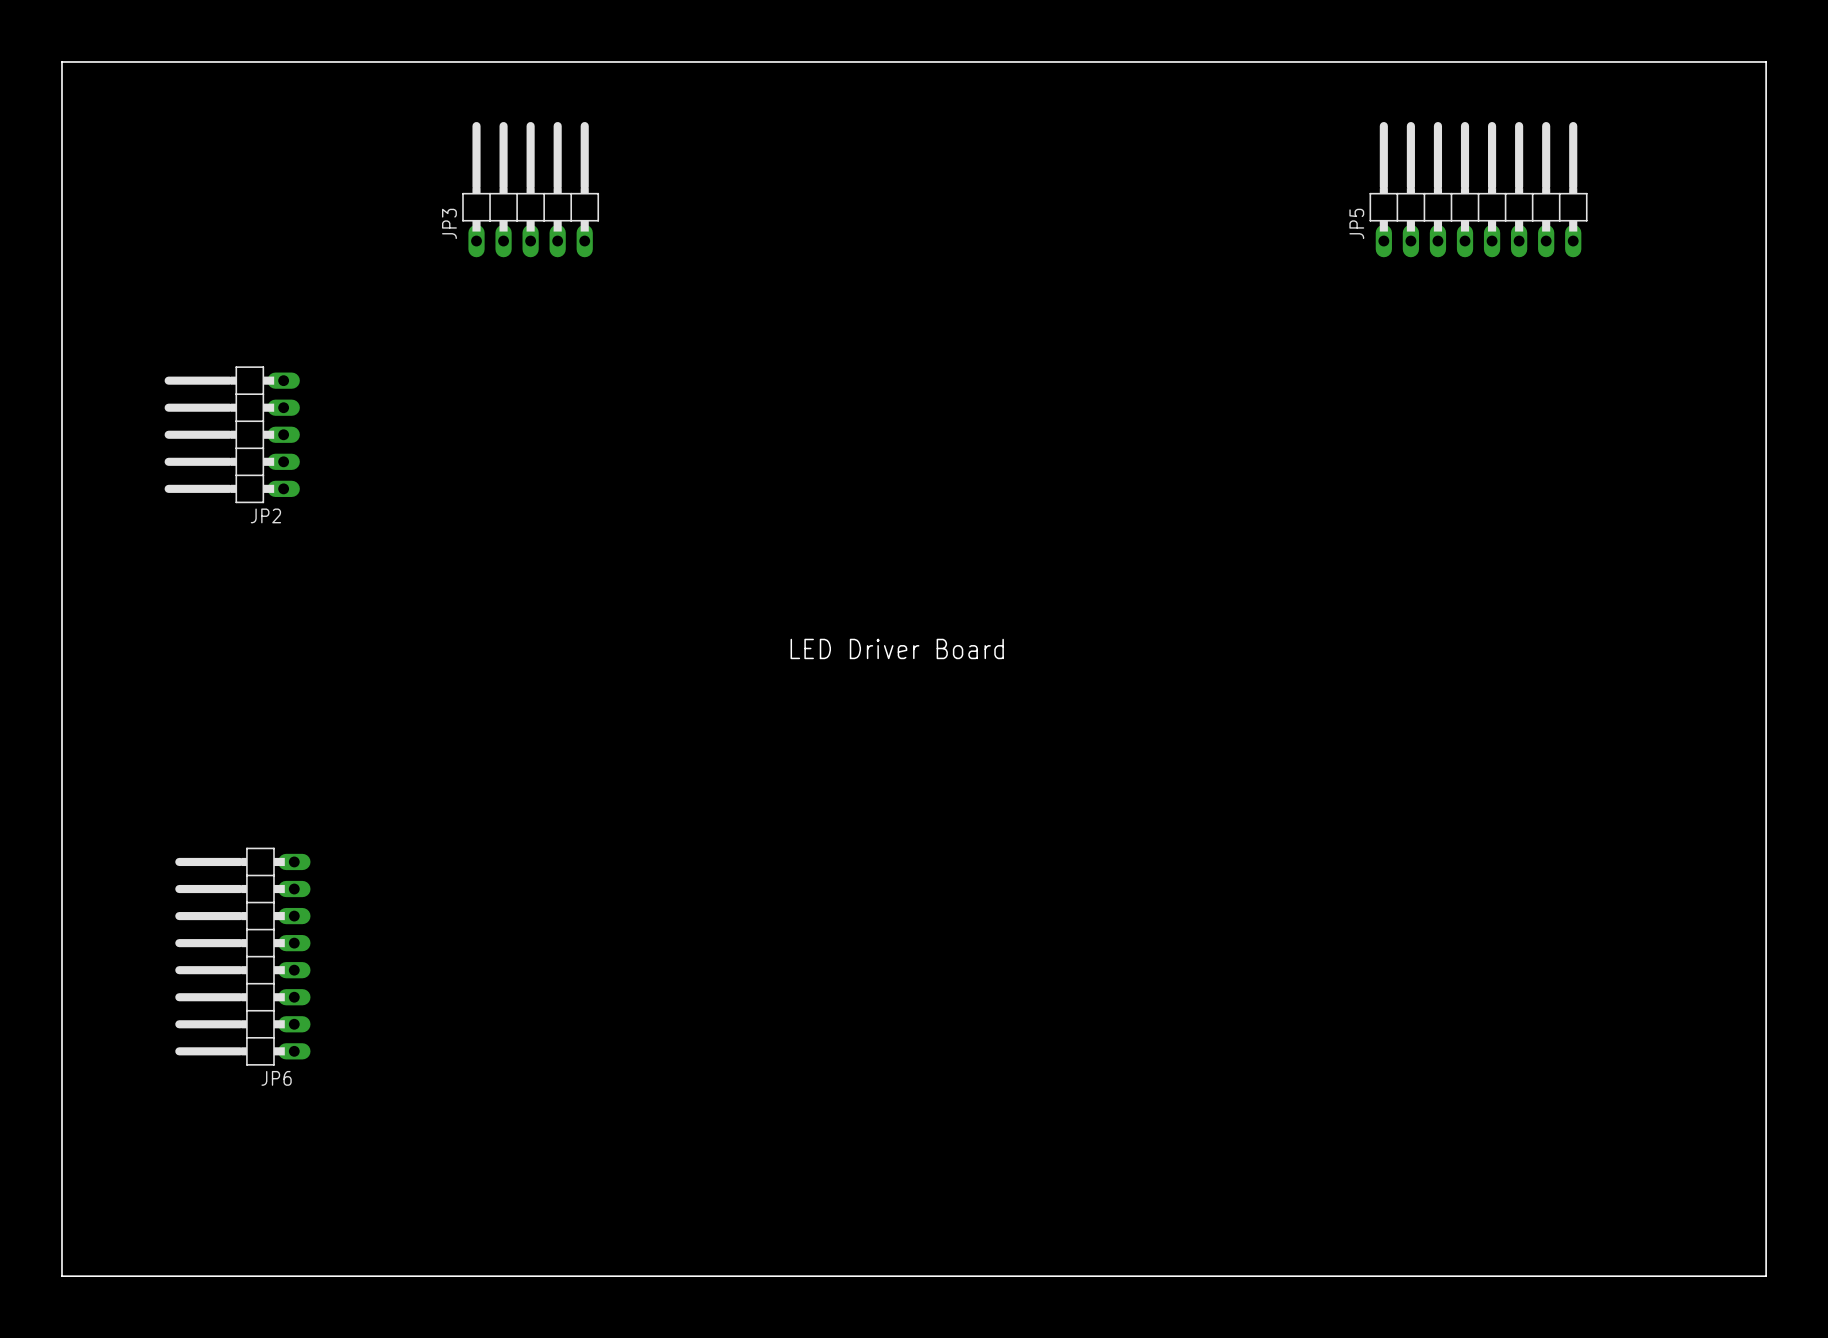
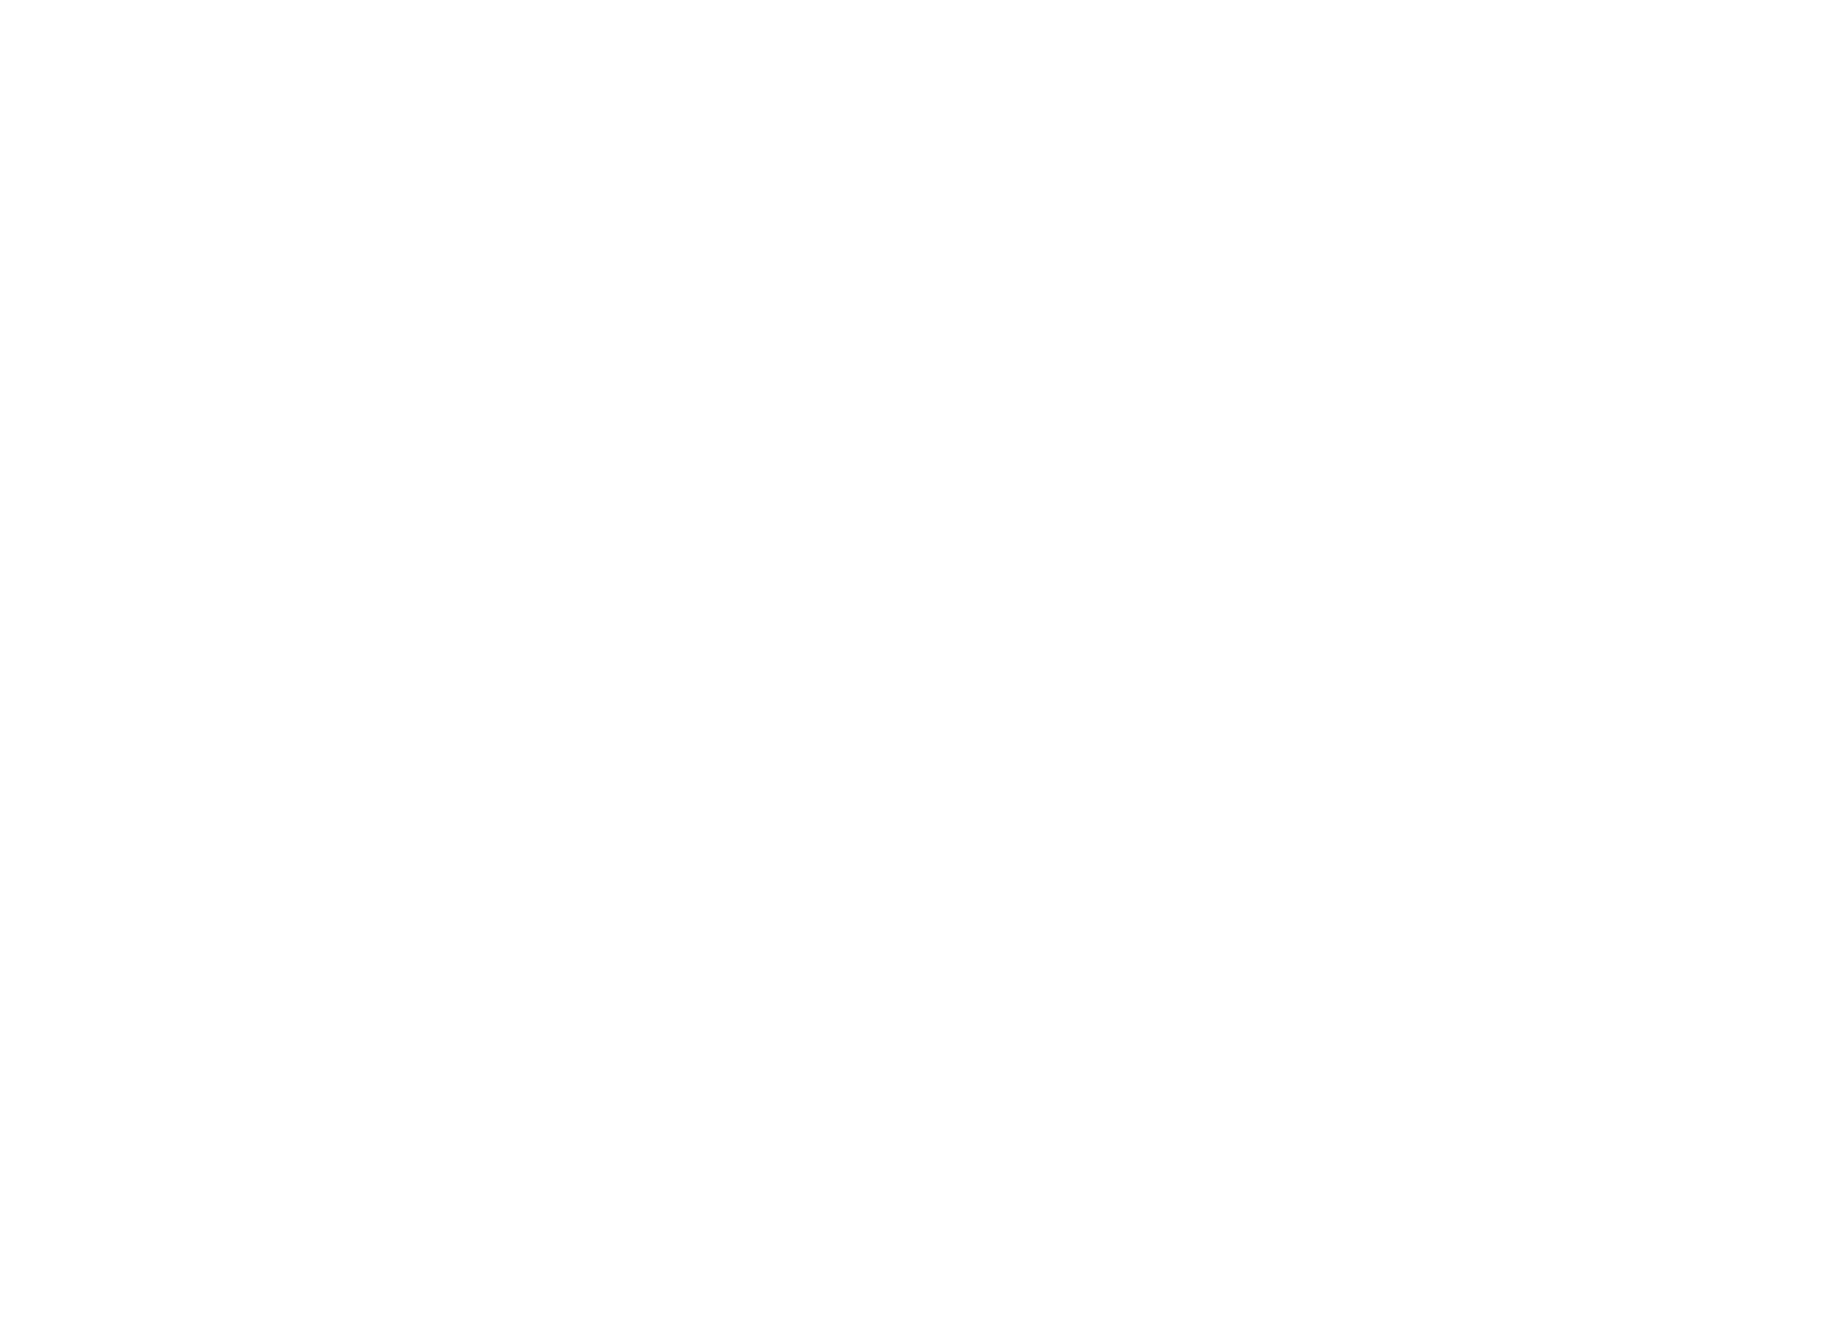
board edge: (61, 61) (1766, 61) (1766, 1276) (61, 1276) (61, 61) -> none
JP3: (530, 189) -> none
JP5: (1478, 189) -> none
JP2: (232, 434) -> none
text: LED Driver Board (897, 648) -> none
JP6: (242, 956) -> none

